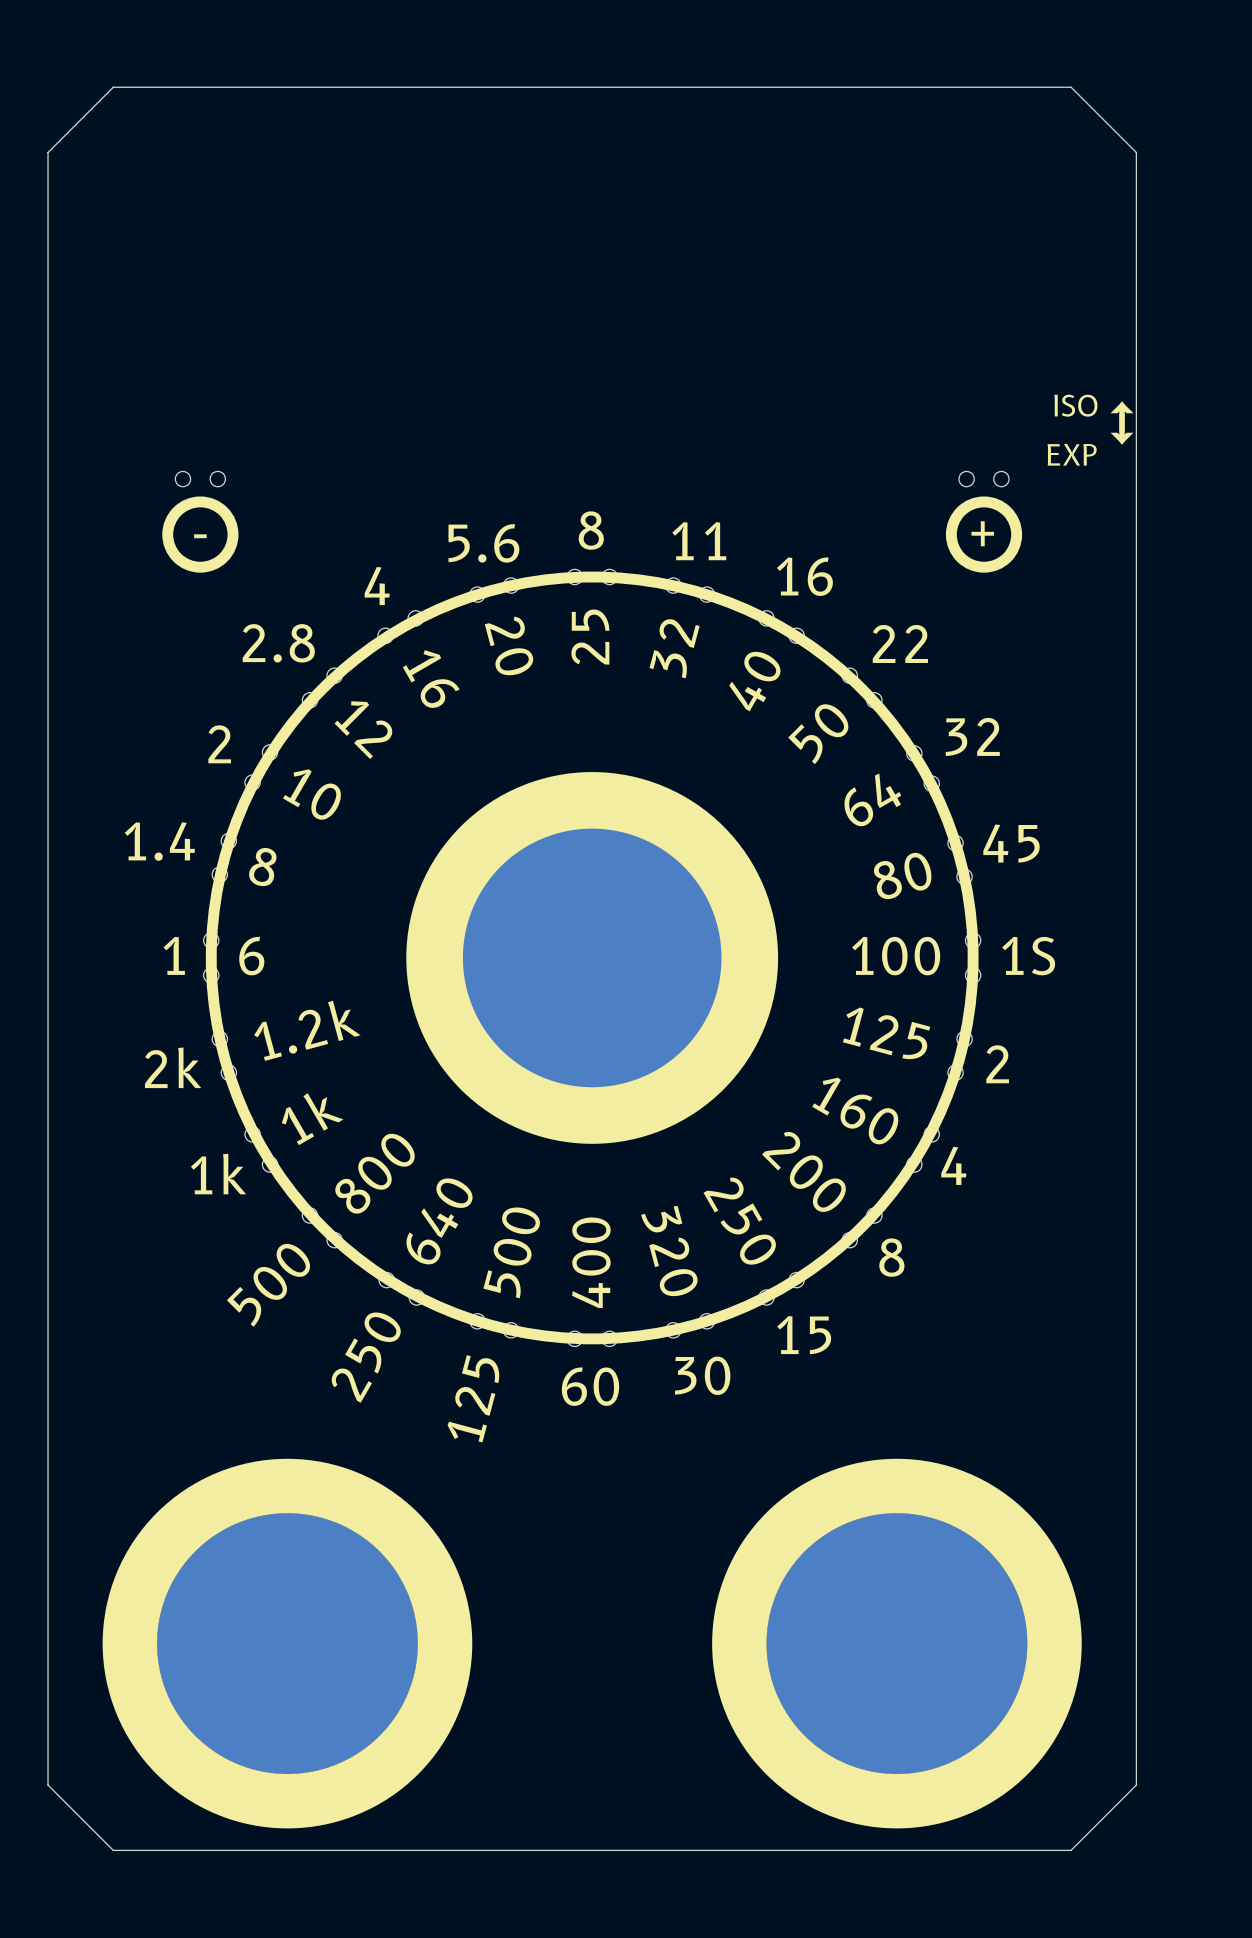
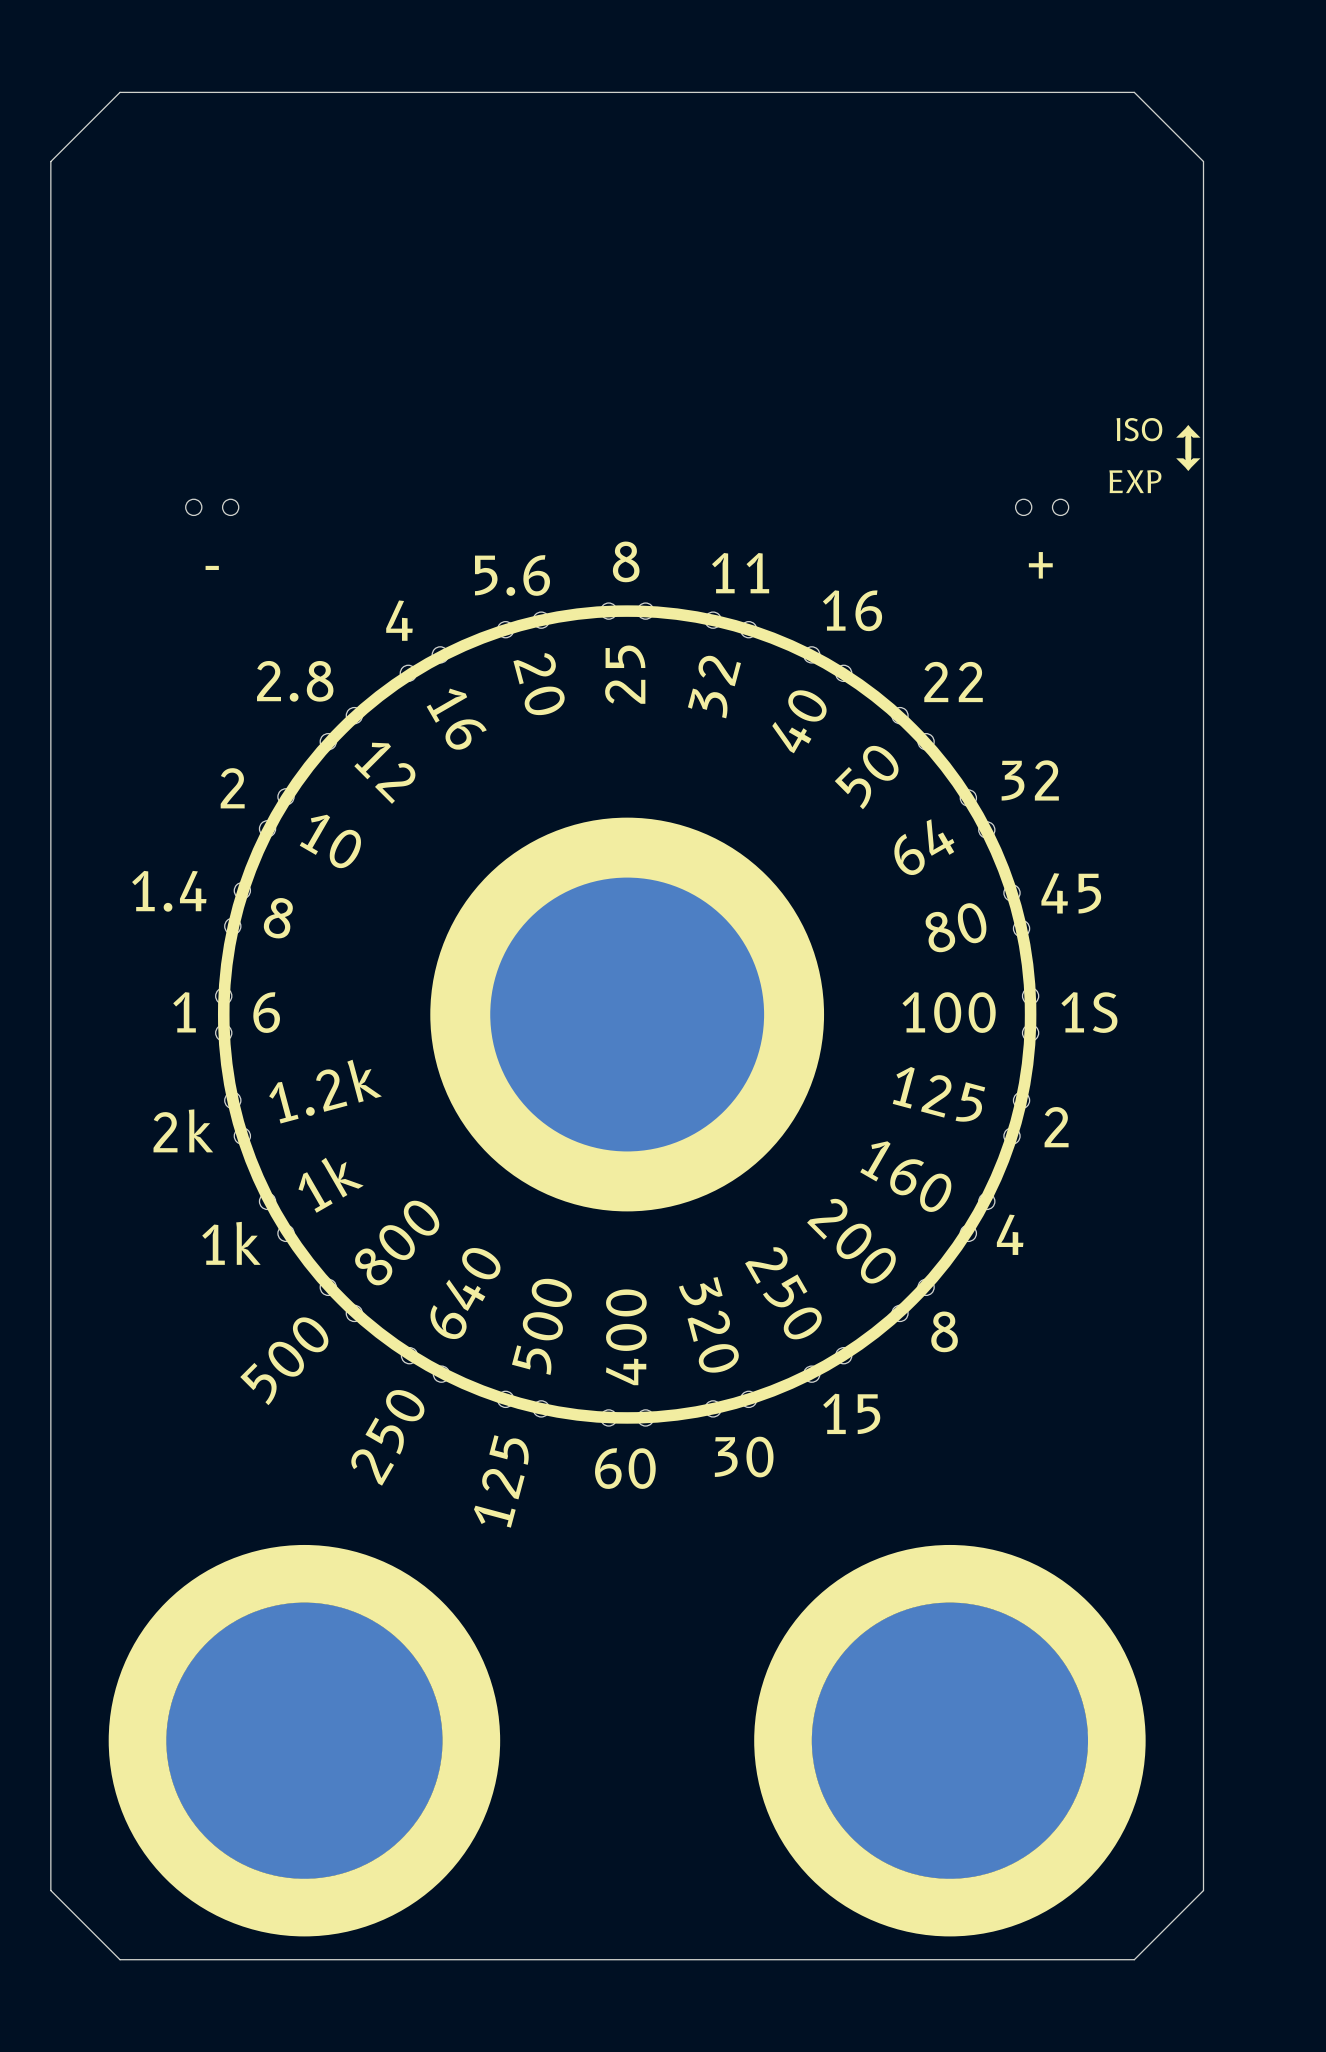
drawing: [162, 496, 239, 573] -> none
drawing: [945, 496, 1023, 573] -> none

